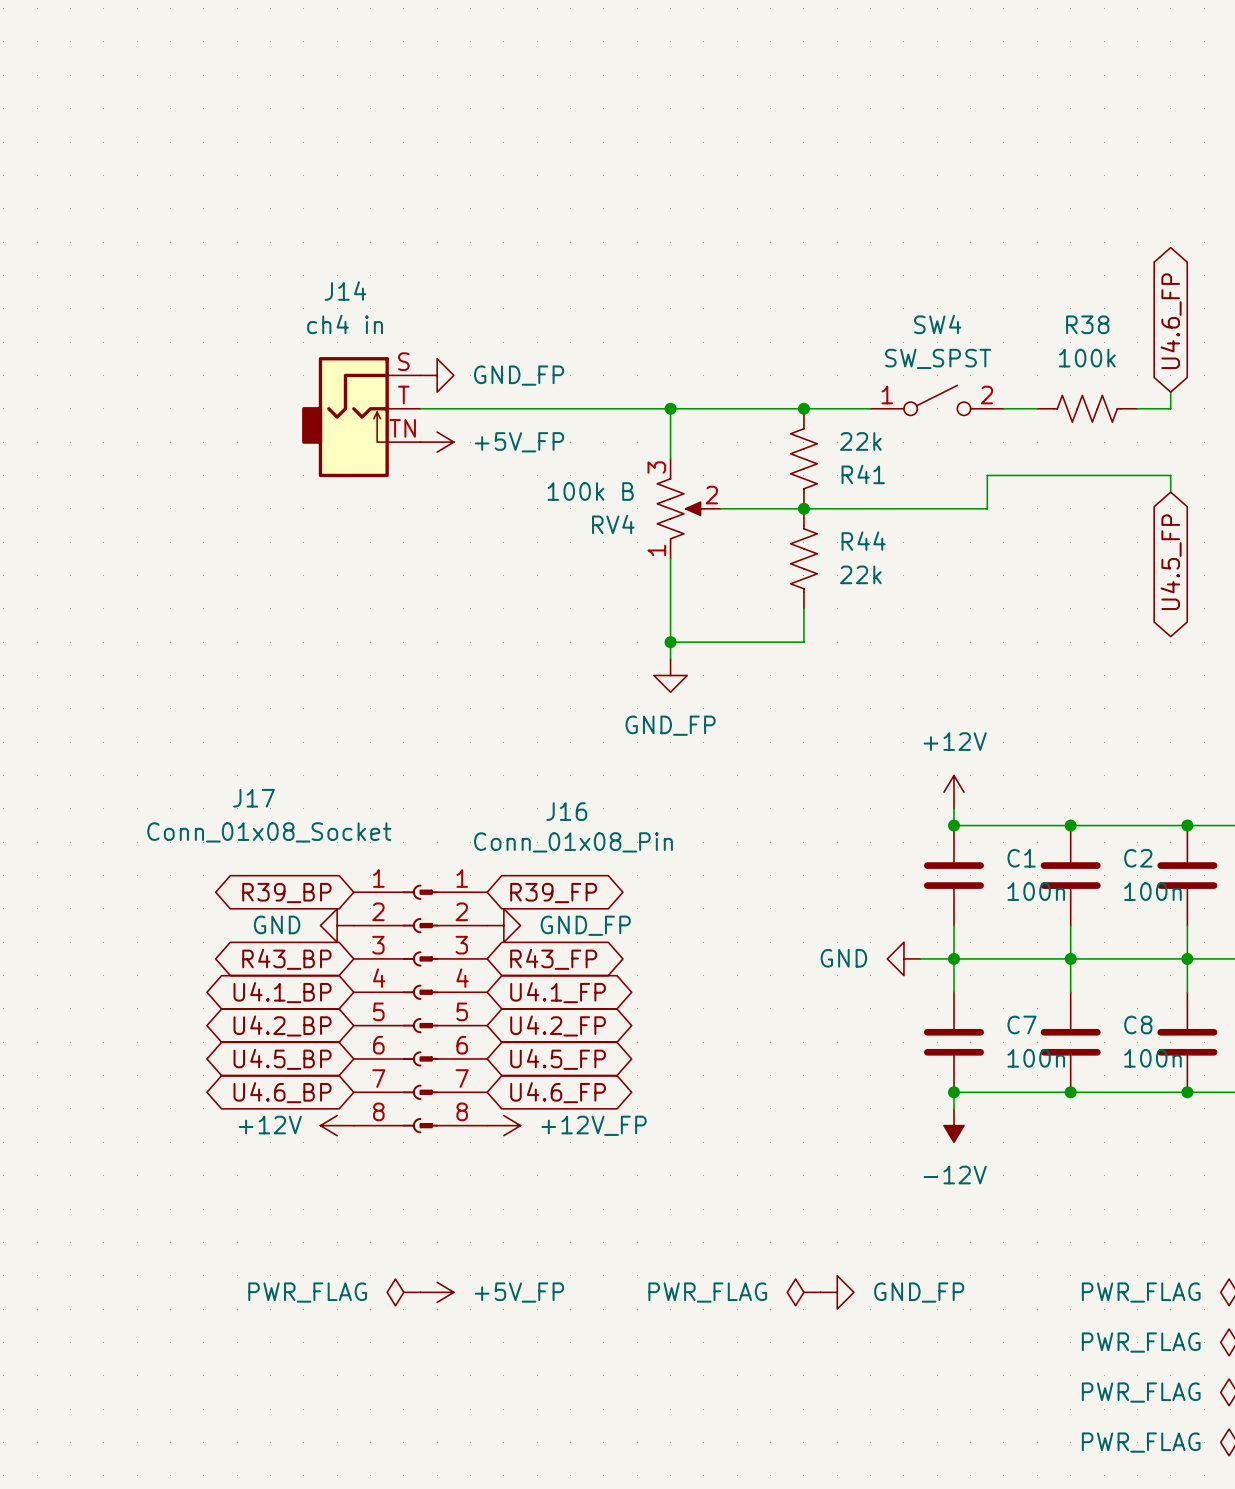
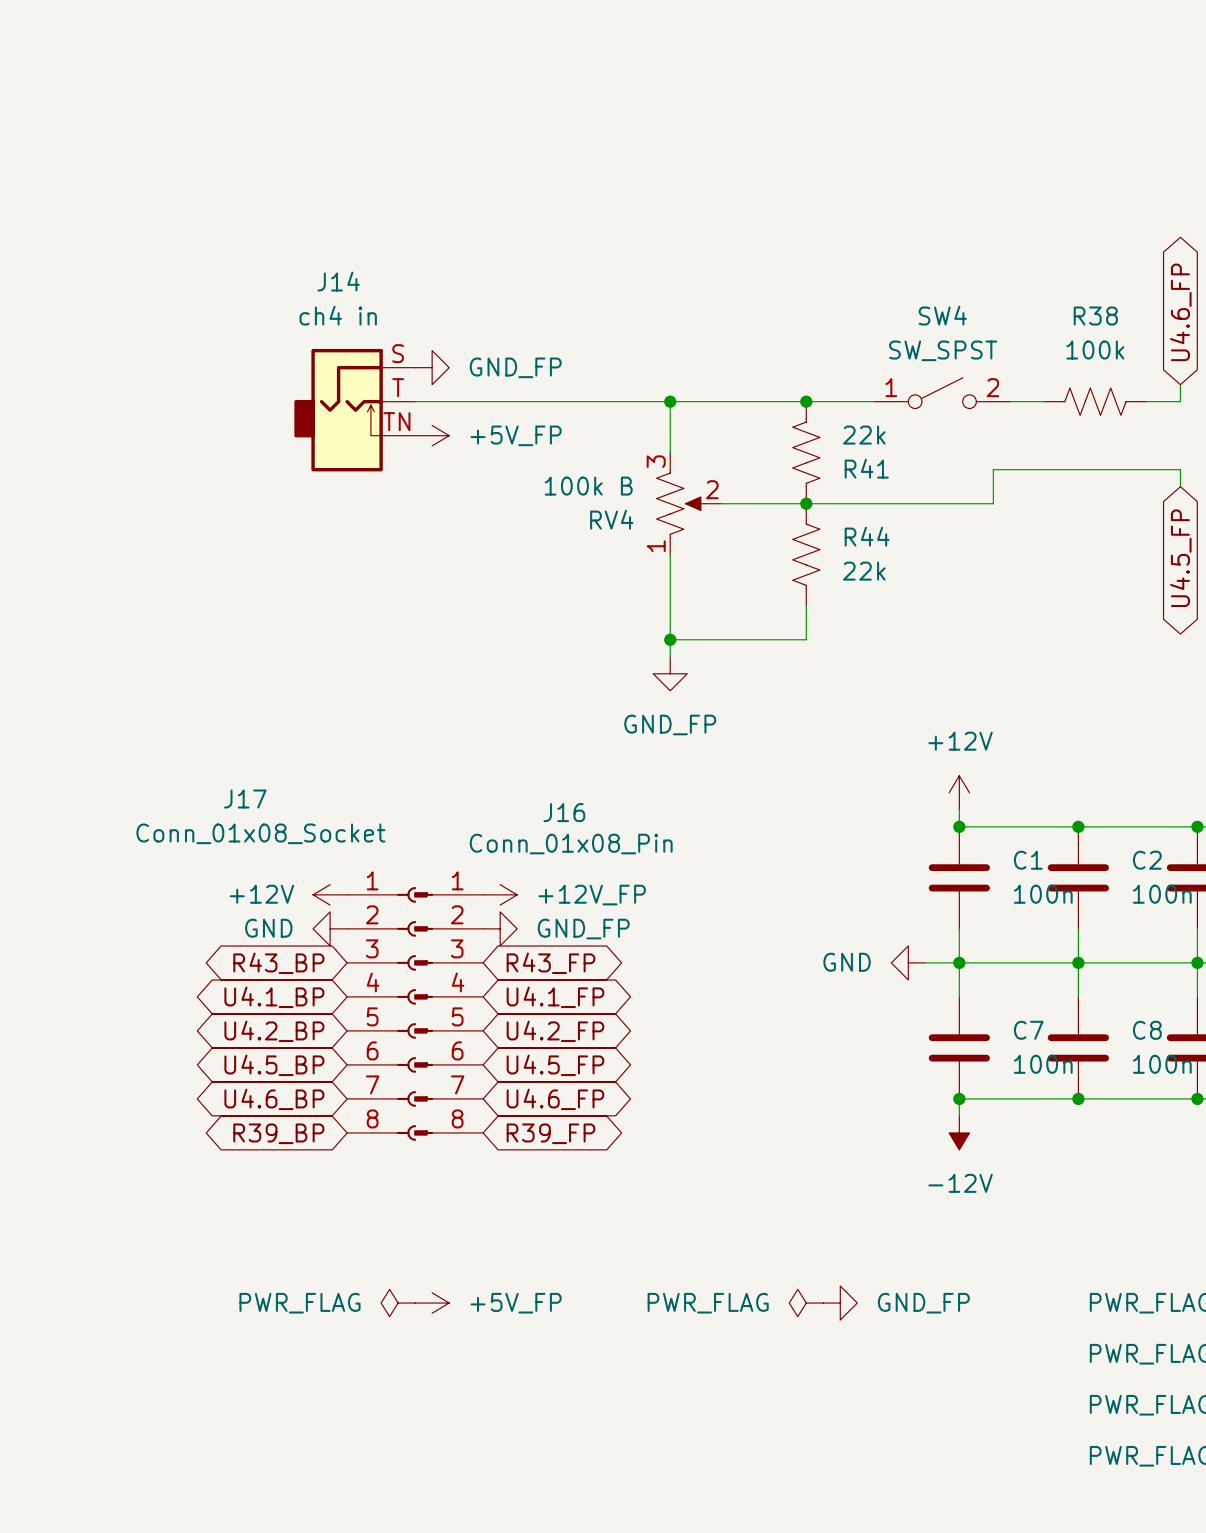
global label position: R39_BP (286, 893) -> R39_BP (278, 1133)
global label position: R39_FP (553, 893) -> R39_FP (551, 1133)
power symbol position: +12V (337, 1125) -> +12V (330, 894)
power symbol position: +12V_FP (503, 1125) -> +12V_FP (500, 894)

